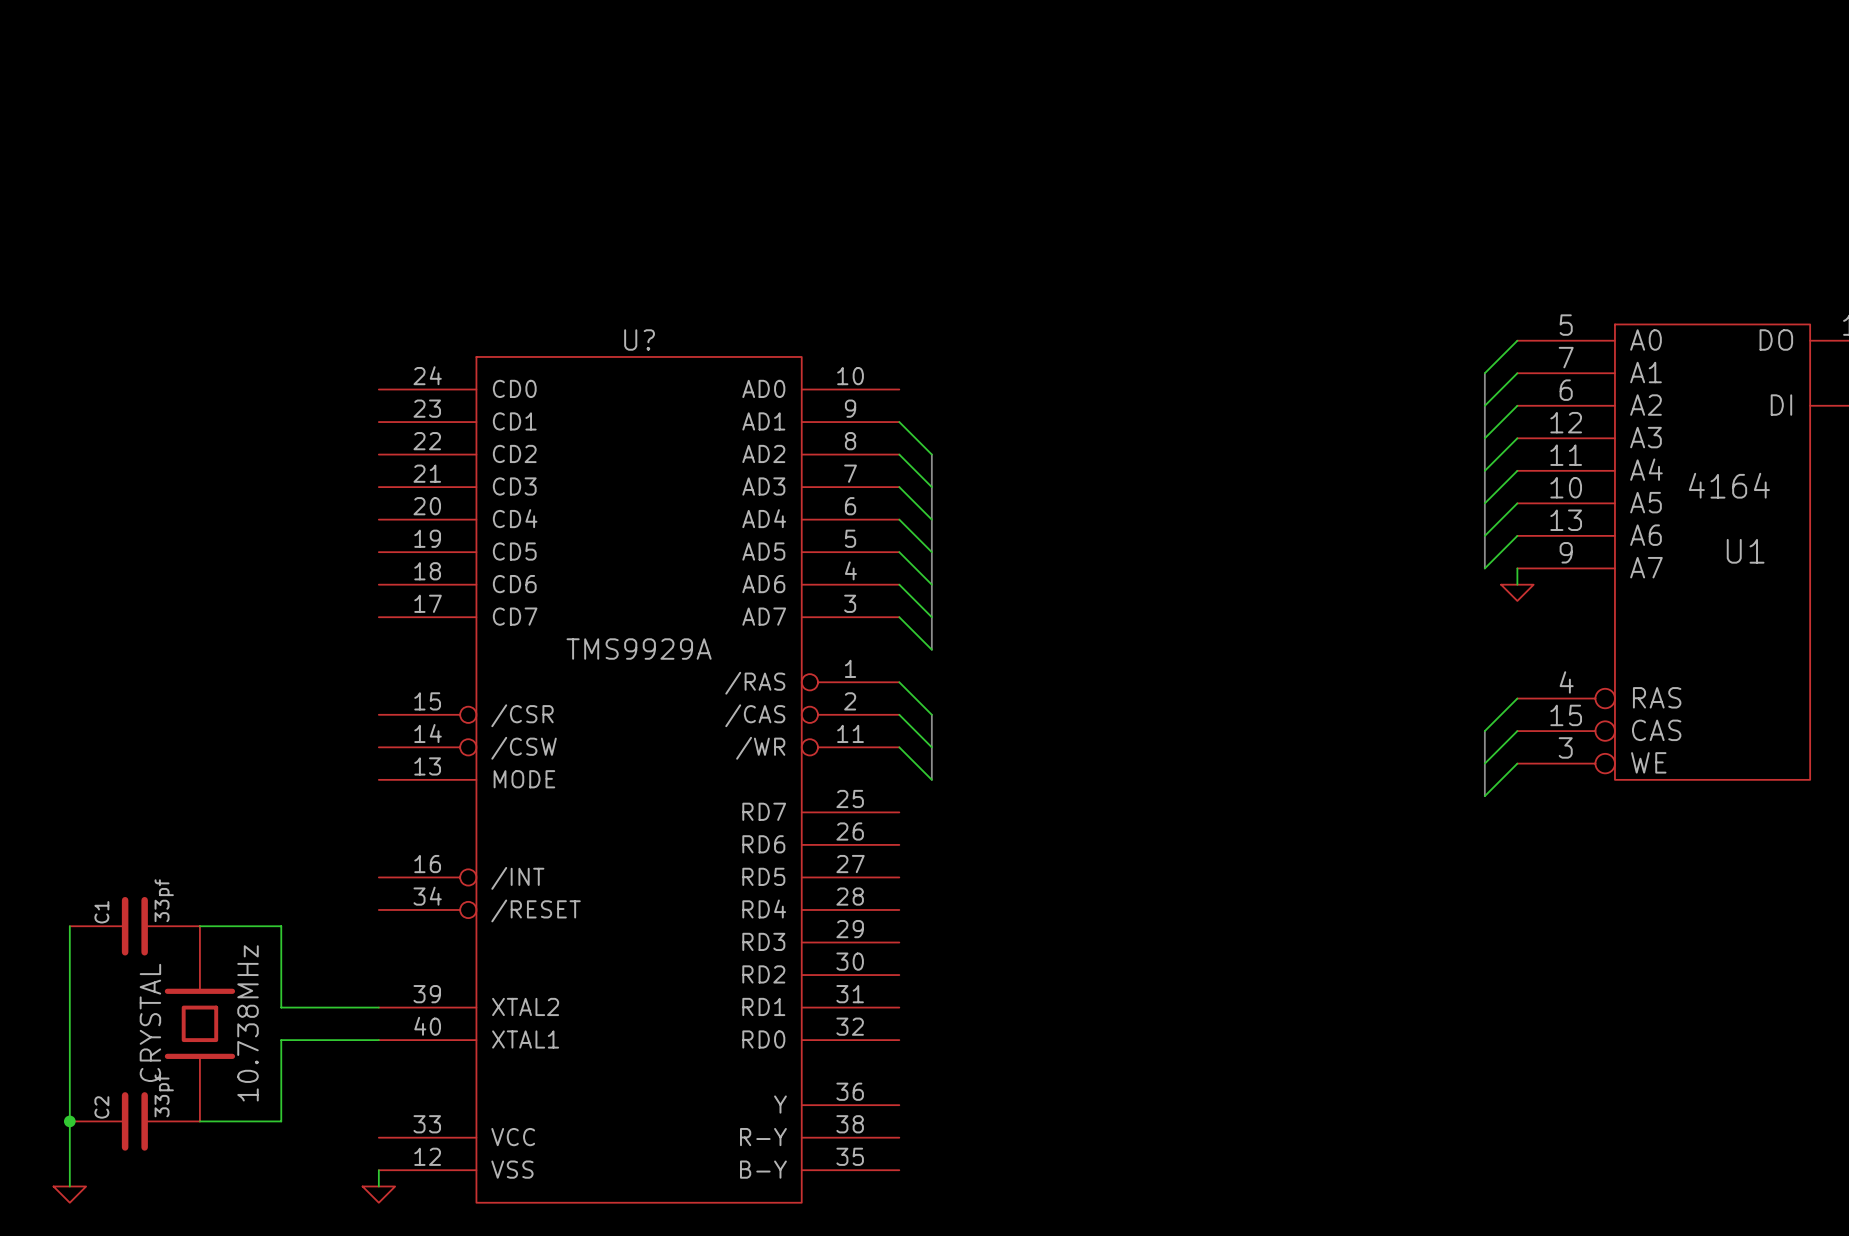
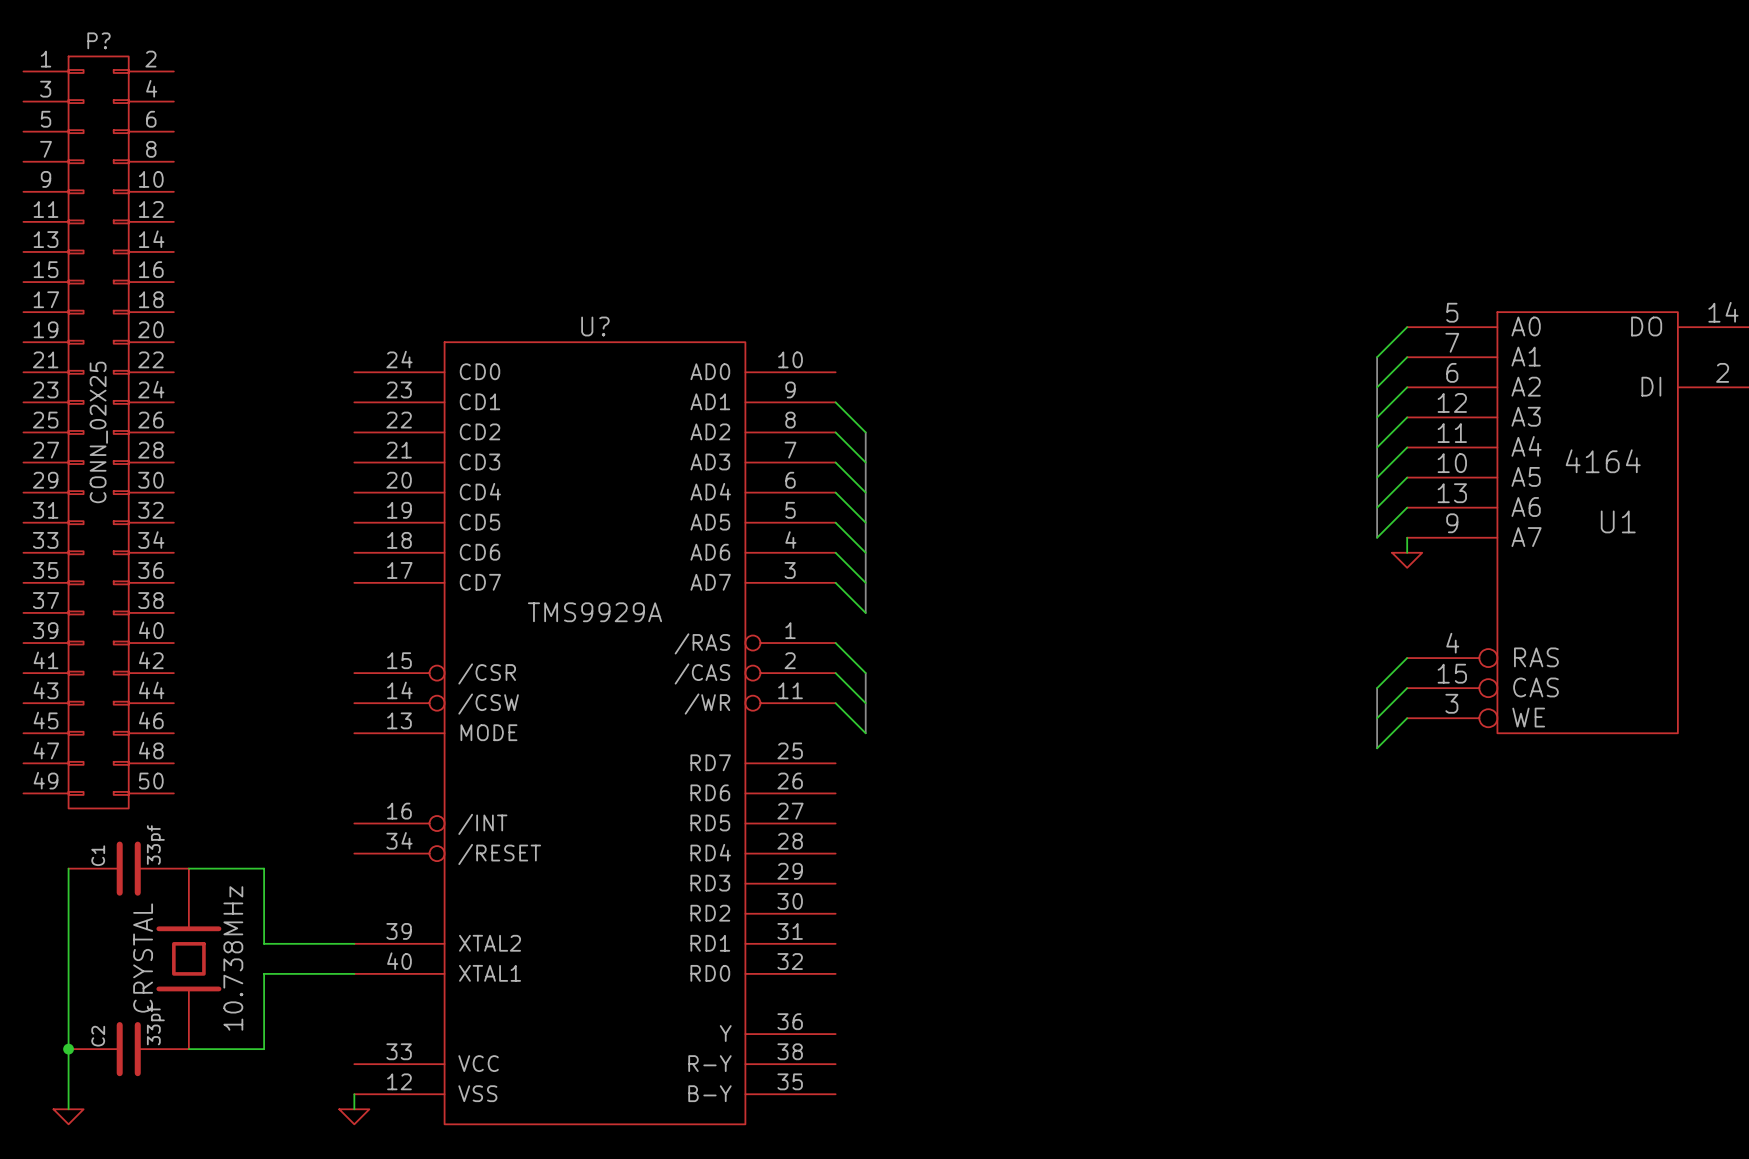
P?: none -> CONN_02X25 (98, 432)

